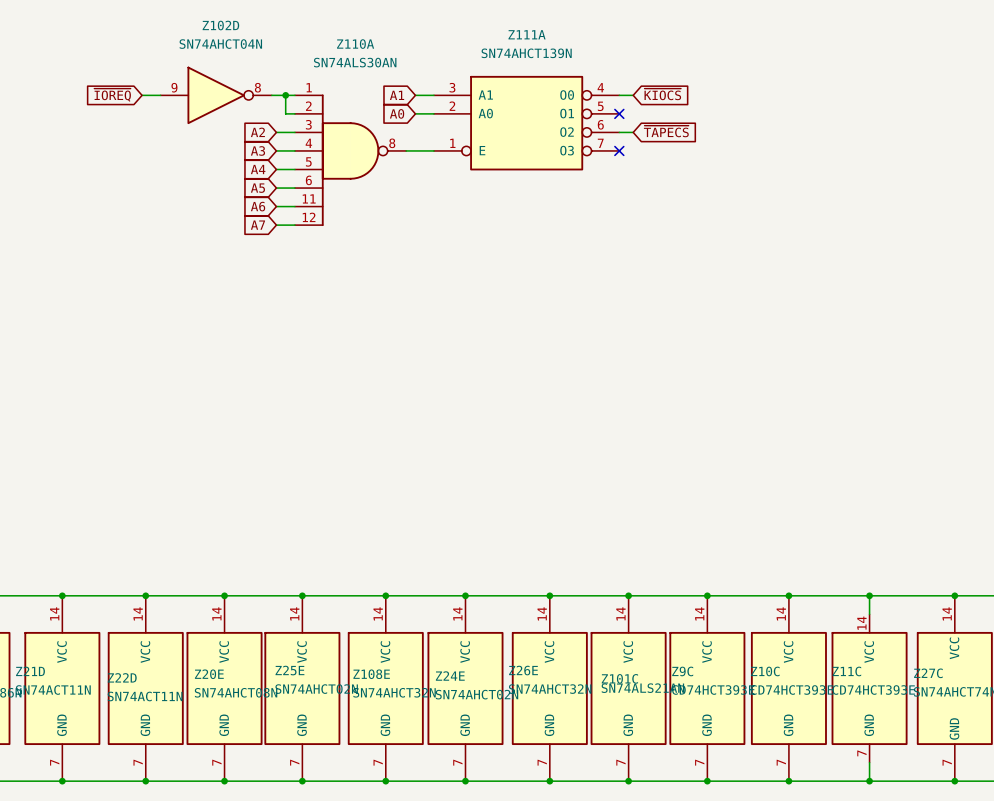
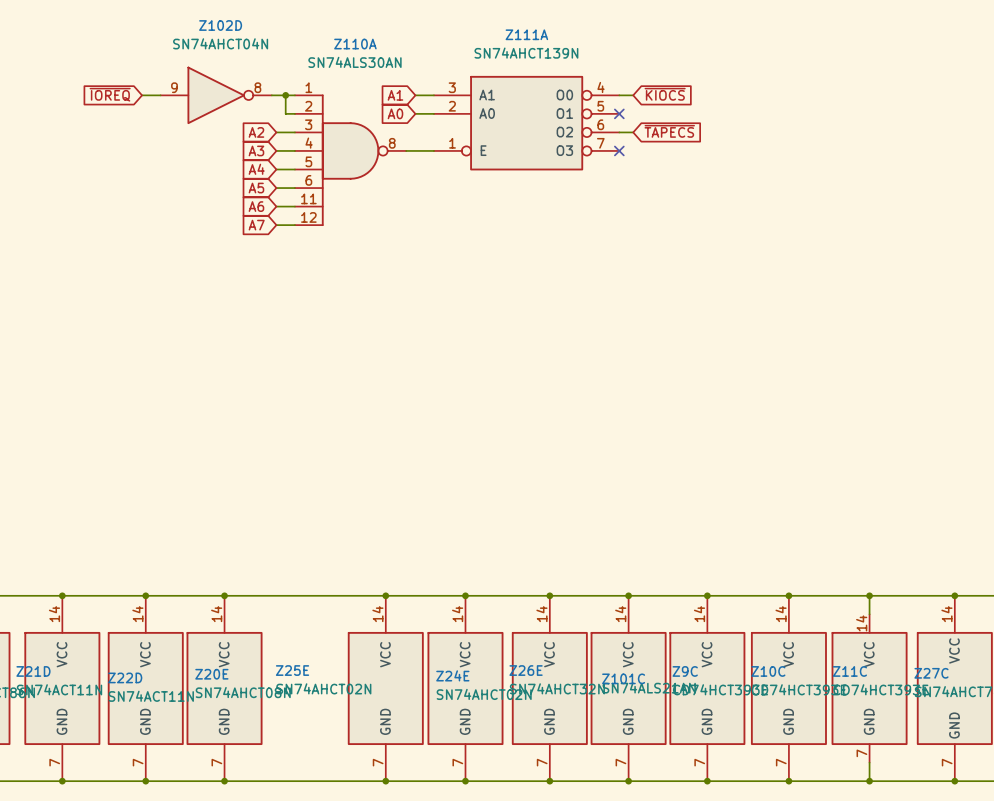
junction: (302, 595) -> none
Z108E: SN74AHCT32N (302, 688) -> none
junction: (302, 781) -> none

